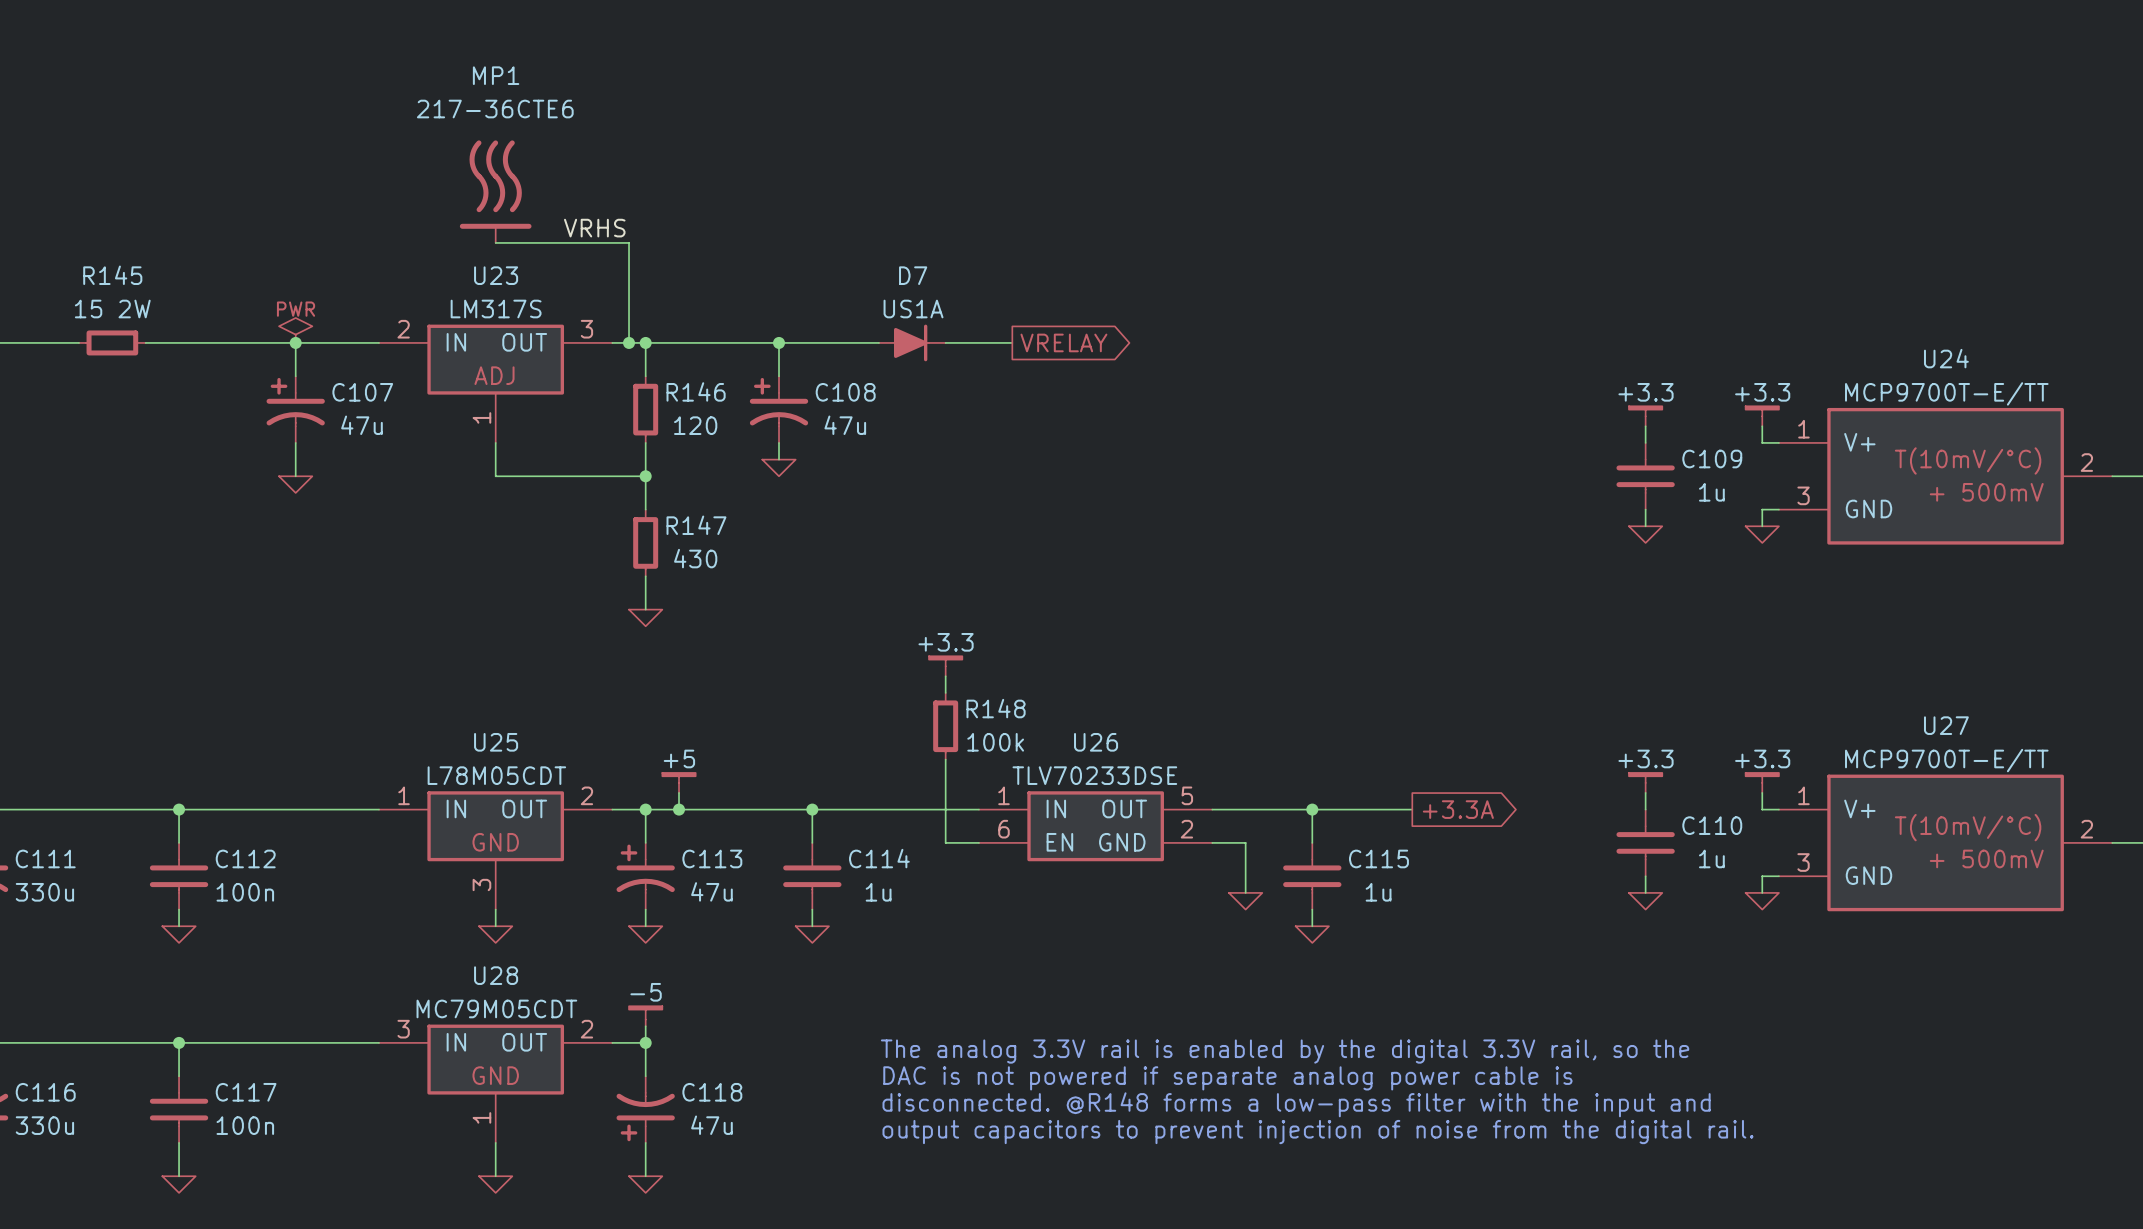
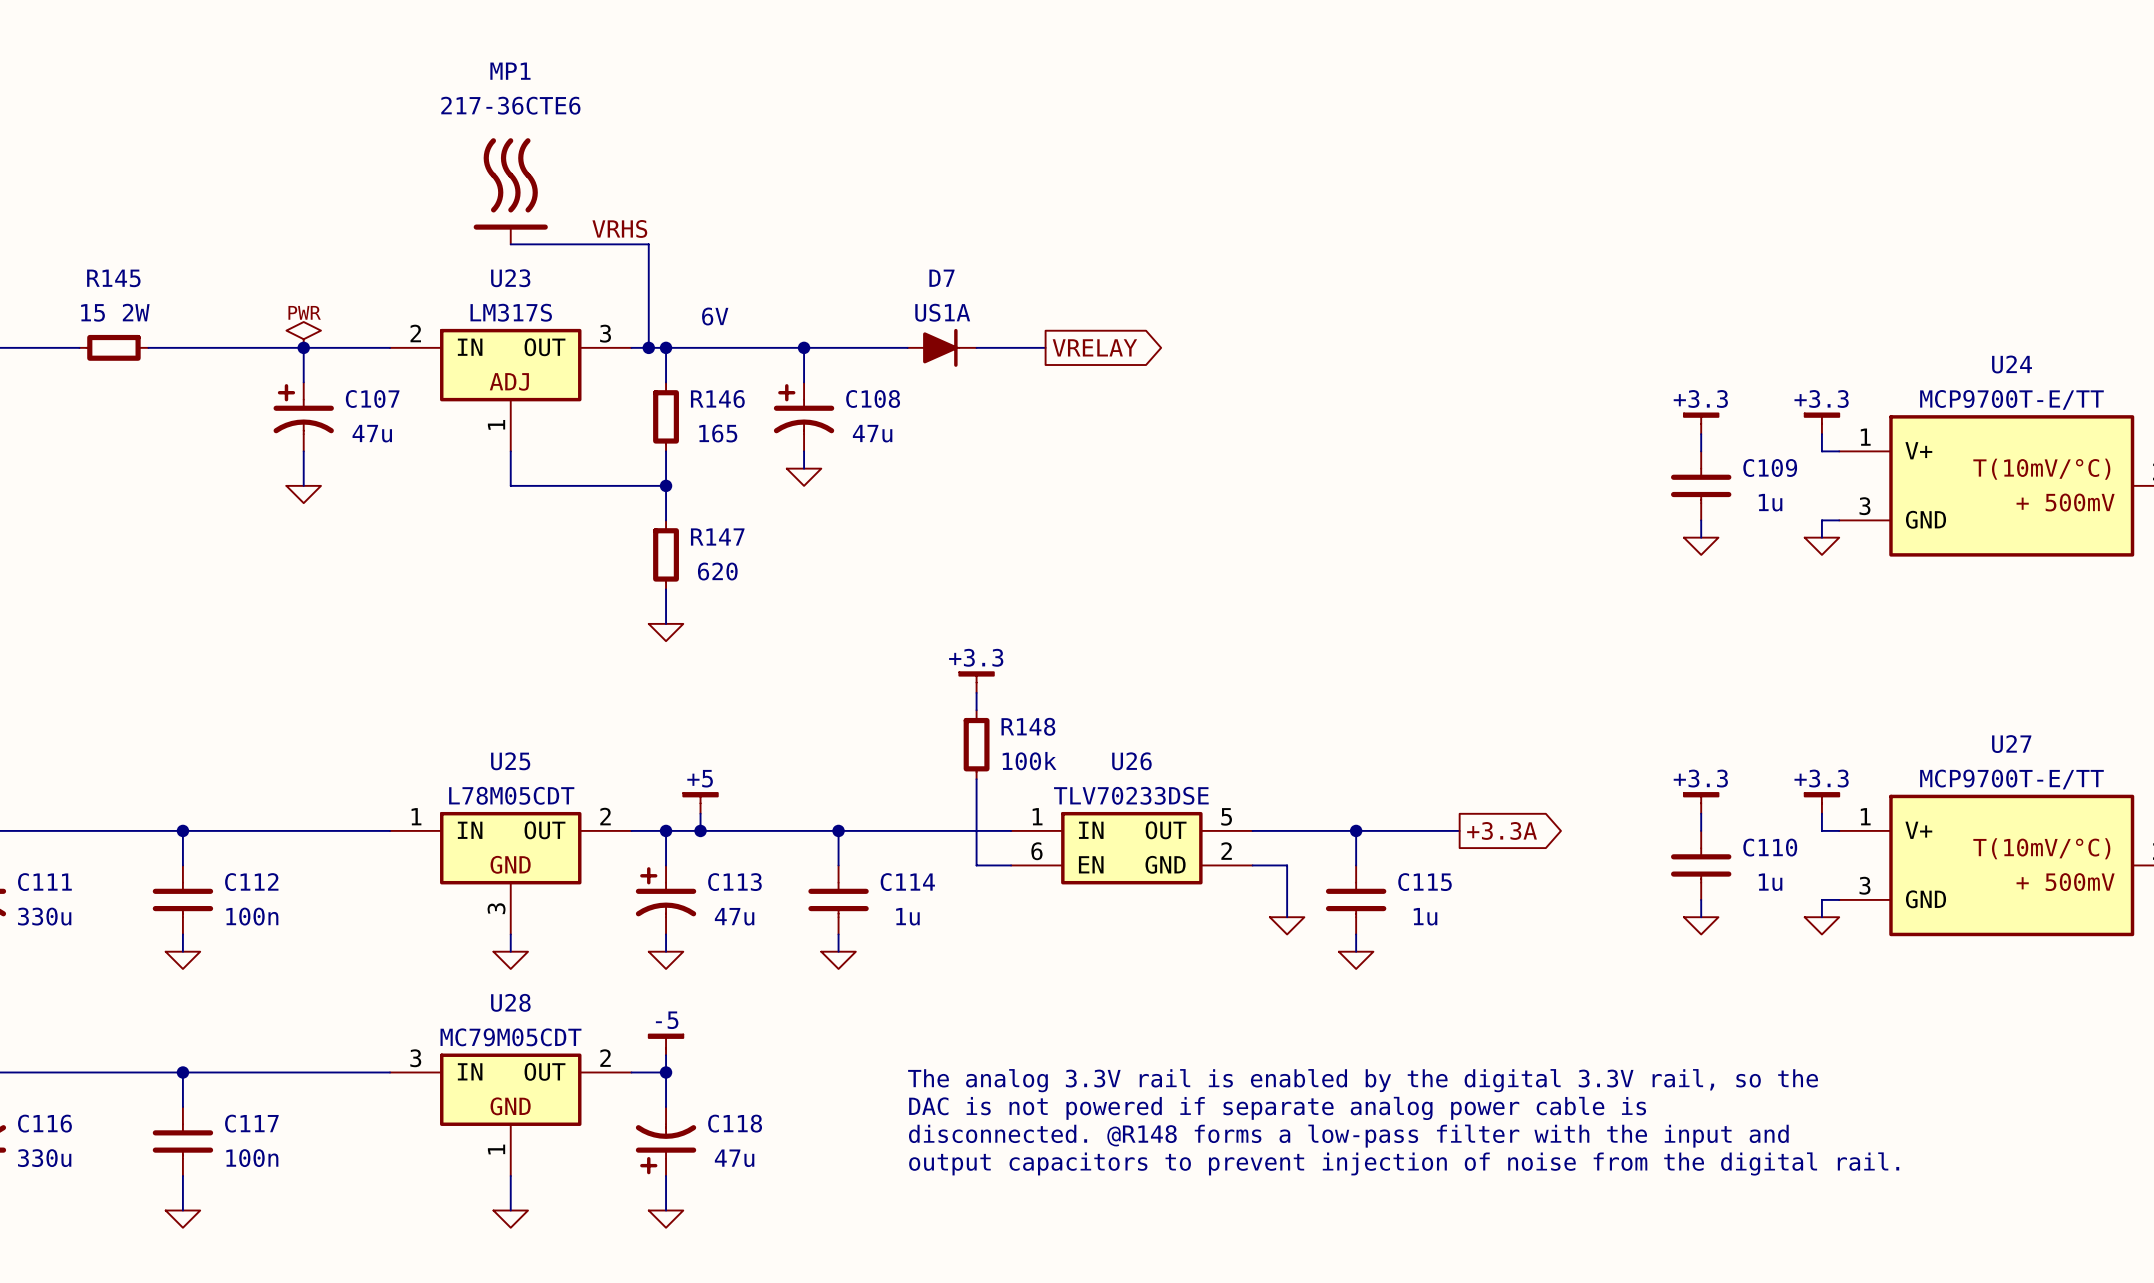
text: none -> 6V (715, 316)
R146 value: 120 (695, 425) -> 165 (718, 433)
R147 value: 430 (695, 558) -> 620 (717, 571)

